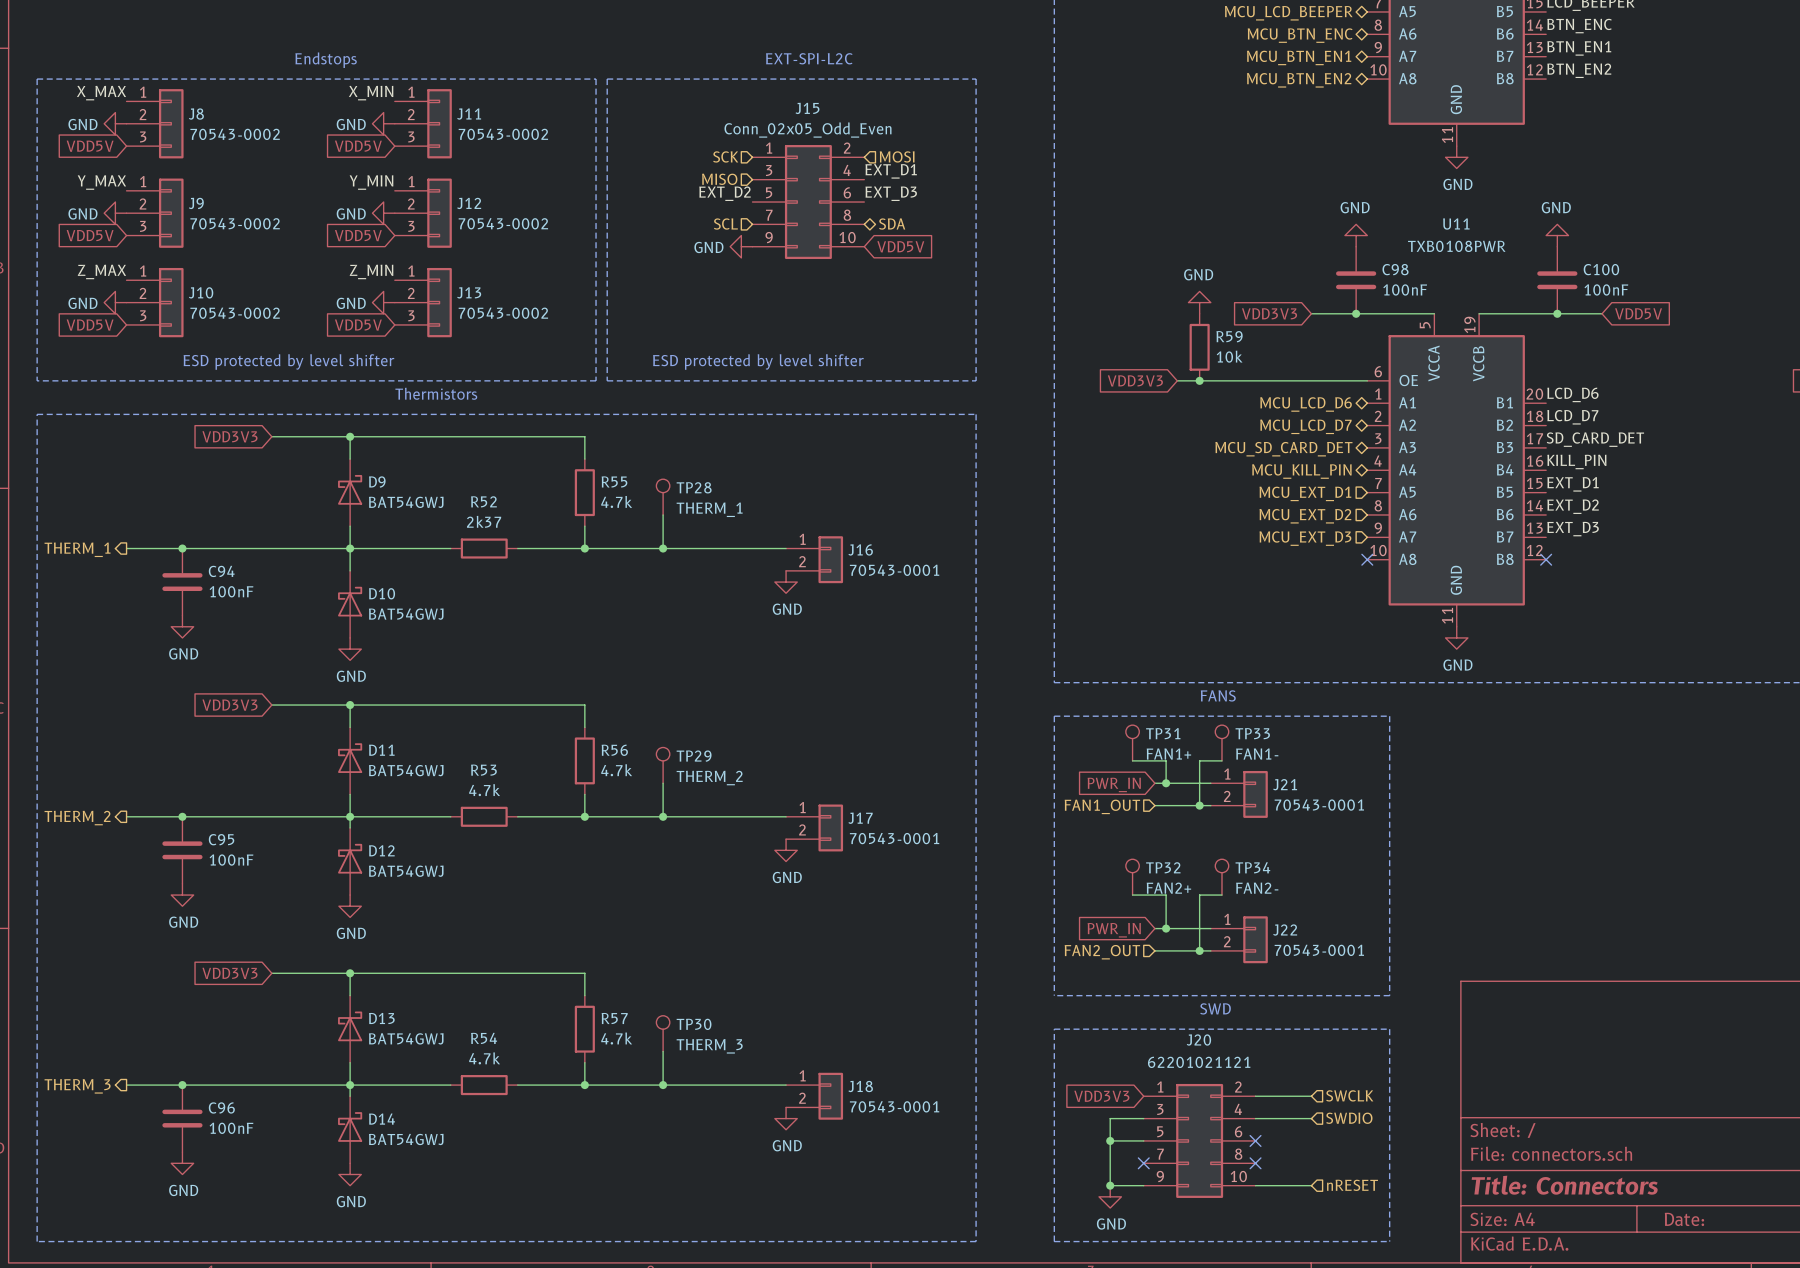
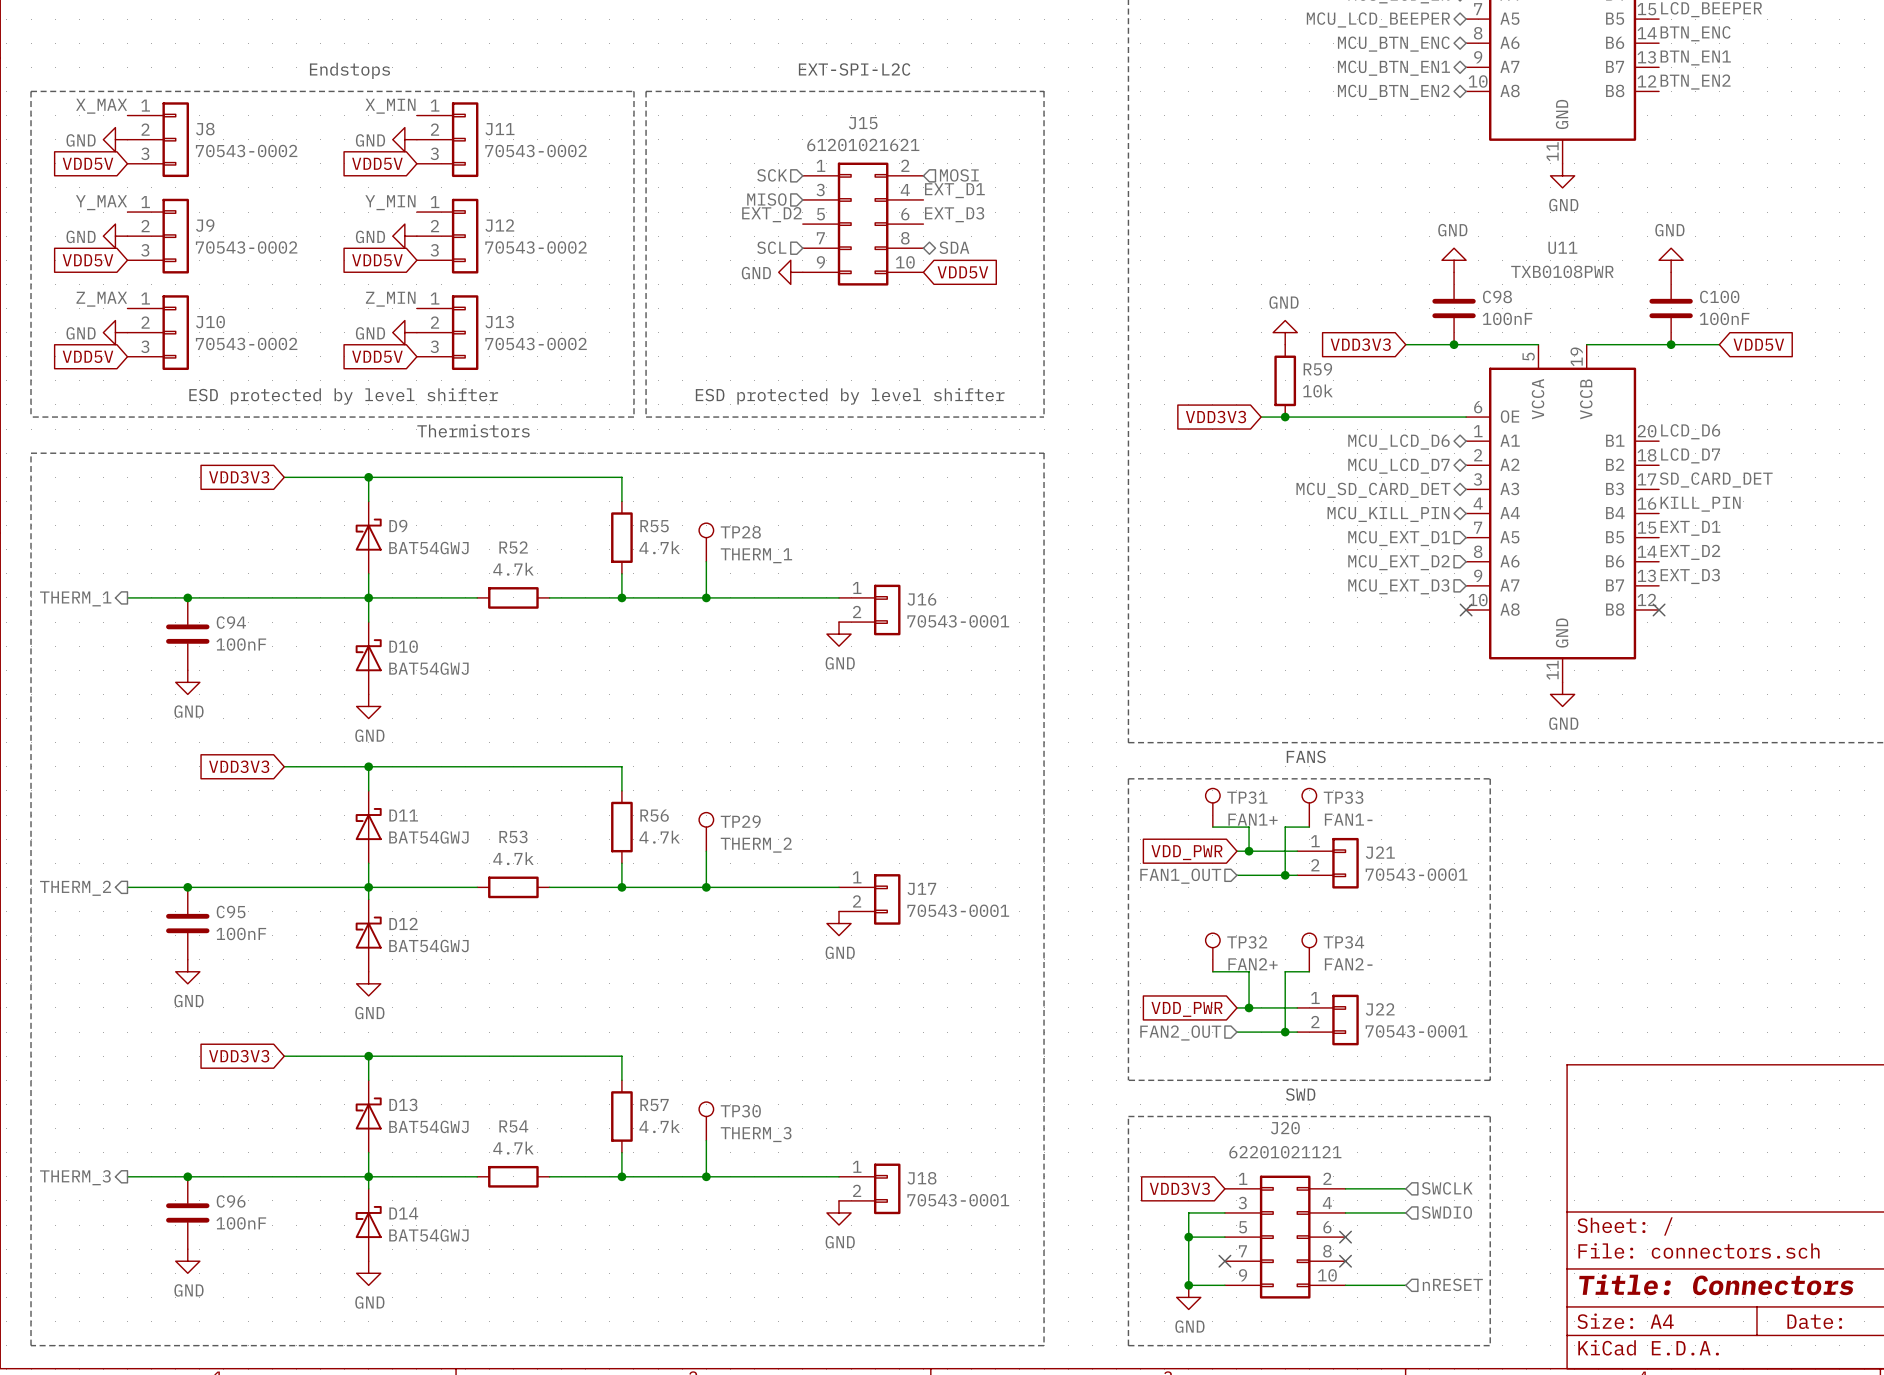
J15 value: Conn_02x05_Odd_Even (808, 130) -> 61201021621 (863, 145)
R52 value: 2k37 (484, 521) -> 4.7k (513, 569)
global label: PWR_IN (1114, 784) -> VDD_PWR (1186, 852)
global label: PWR_IN (1114, 930) -> VDD_PWR (1186, 1009)

